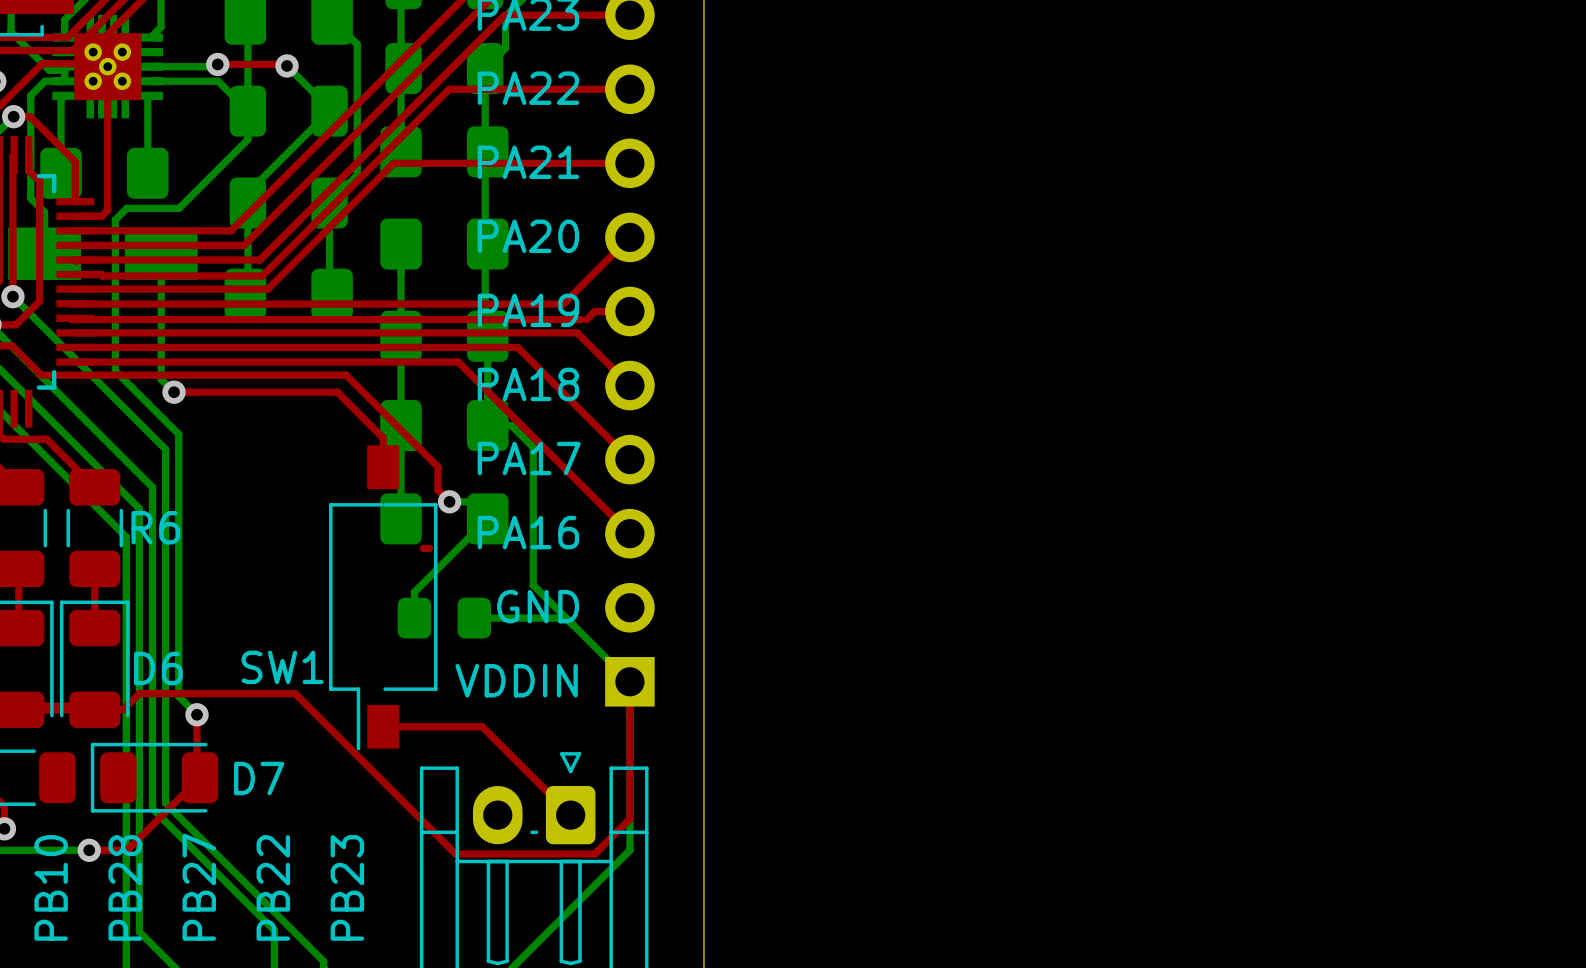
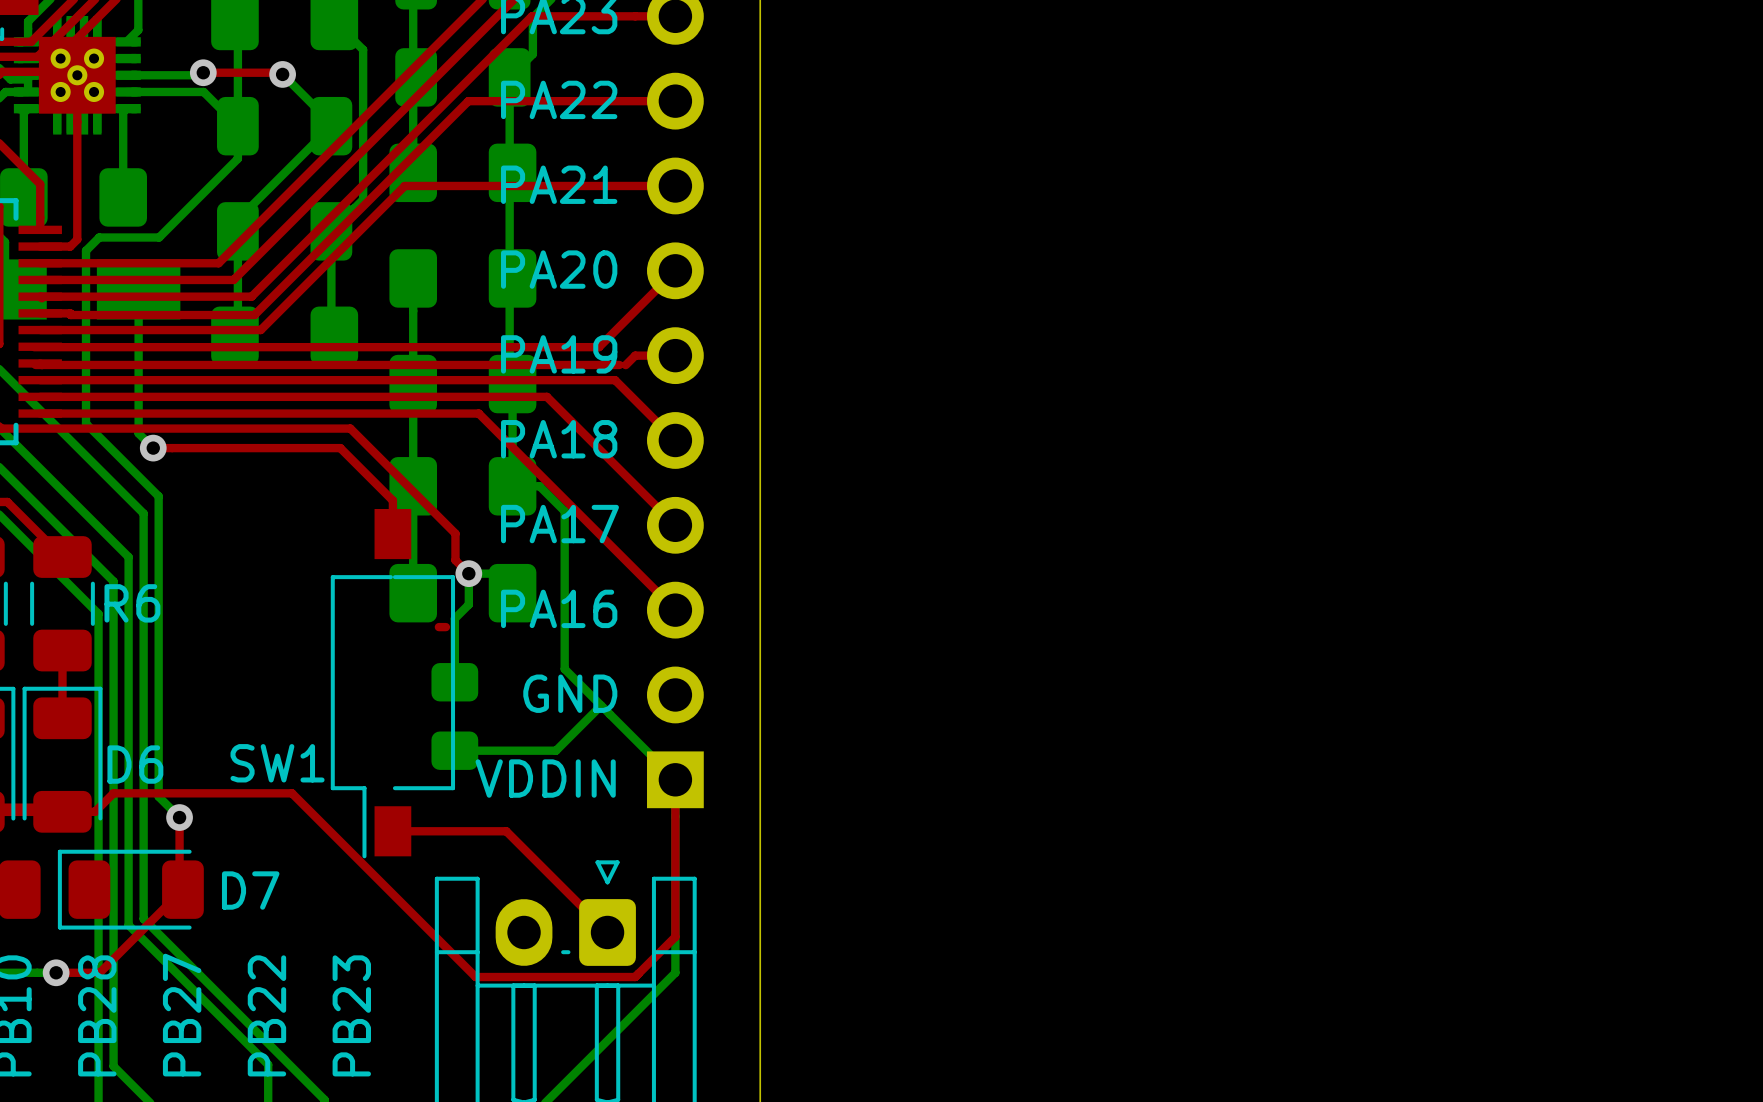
bottom track: none -> (468, 573) (468, 604) (454, 618) (454, 682)
bottom track: (487, 518) (414, 592) (414, 618) -> none
bottom track: none -> (601, 705) (556, 750) (454, 750)
part rotation: 0° (444, 618) -> 90° clockwise (454, 716)
bottom track: (474, 618) (566, 618) -> none

